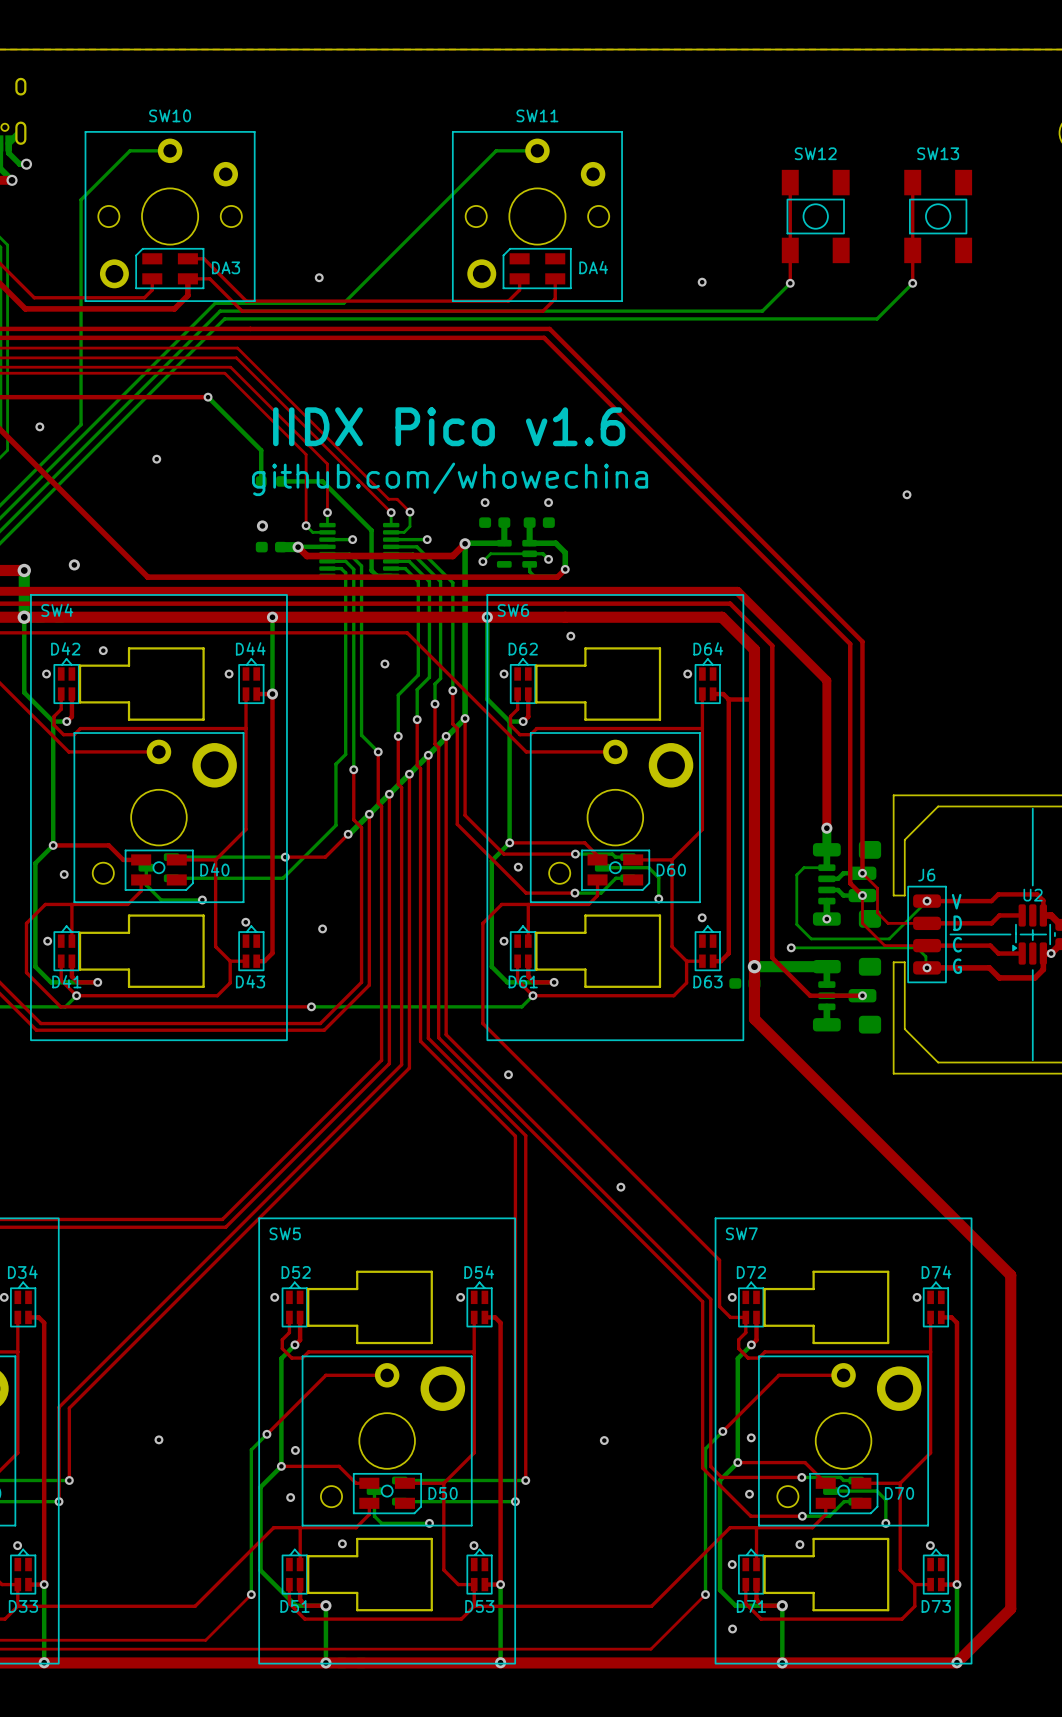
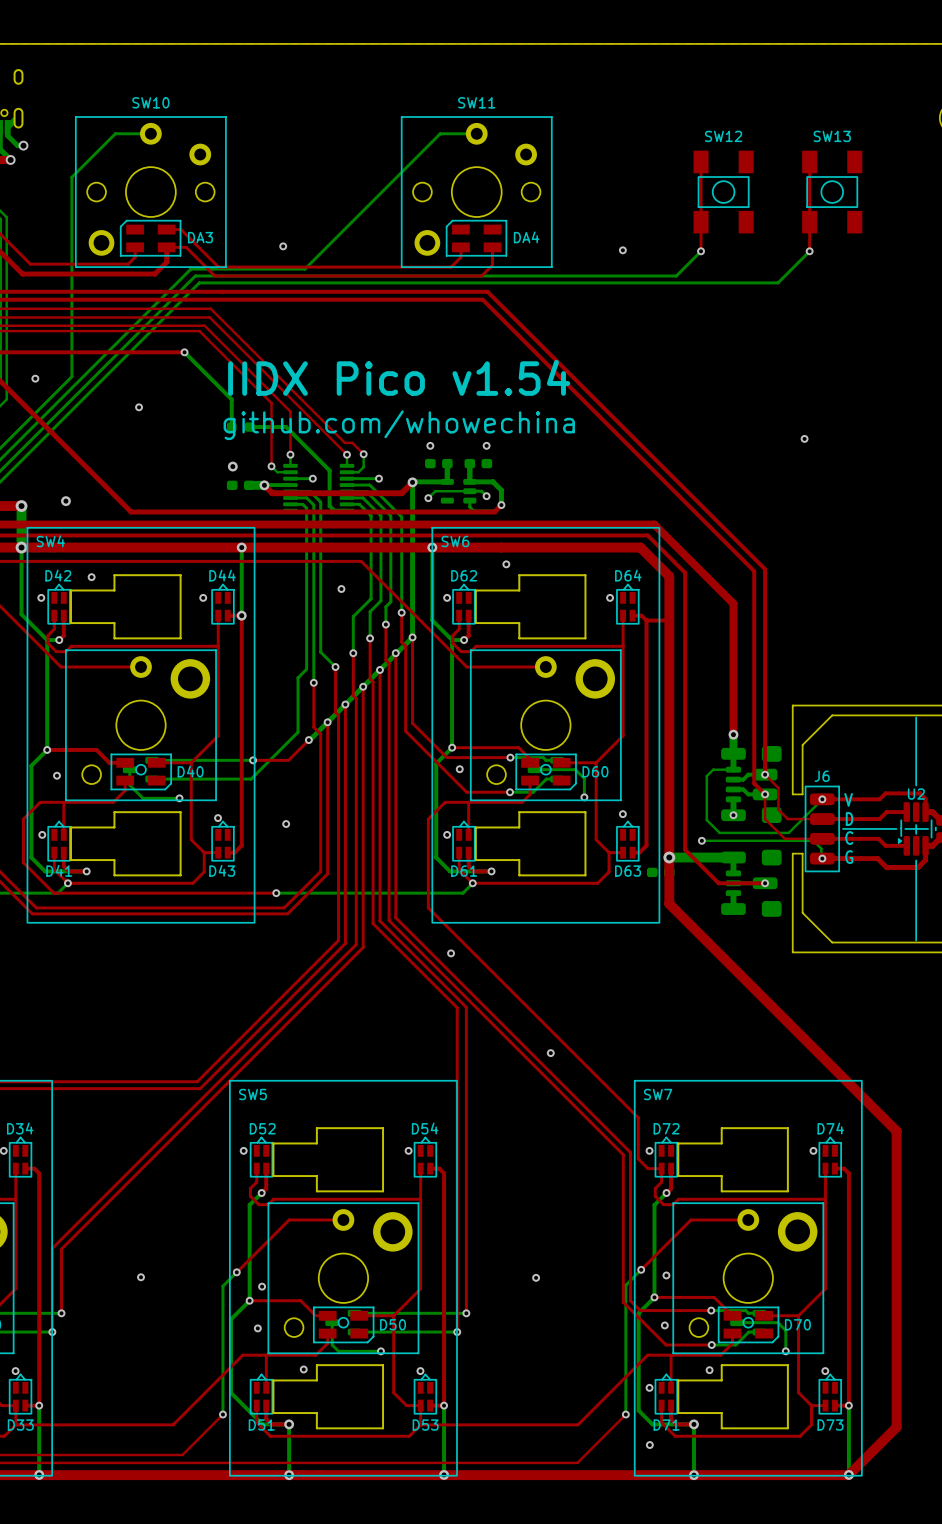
text: IIDX Pico v1.6 (449, 426) -> IIDX Pico v1.54 (399, 377)
via: (1051, 953) -> none

